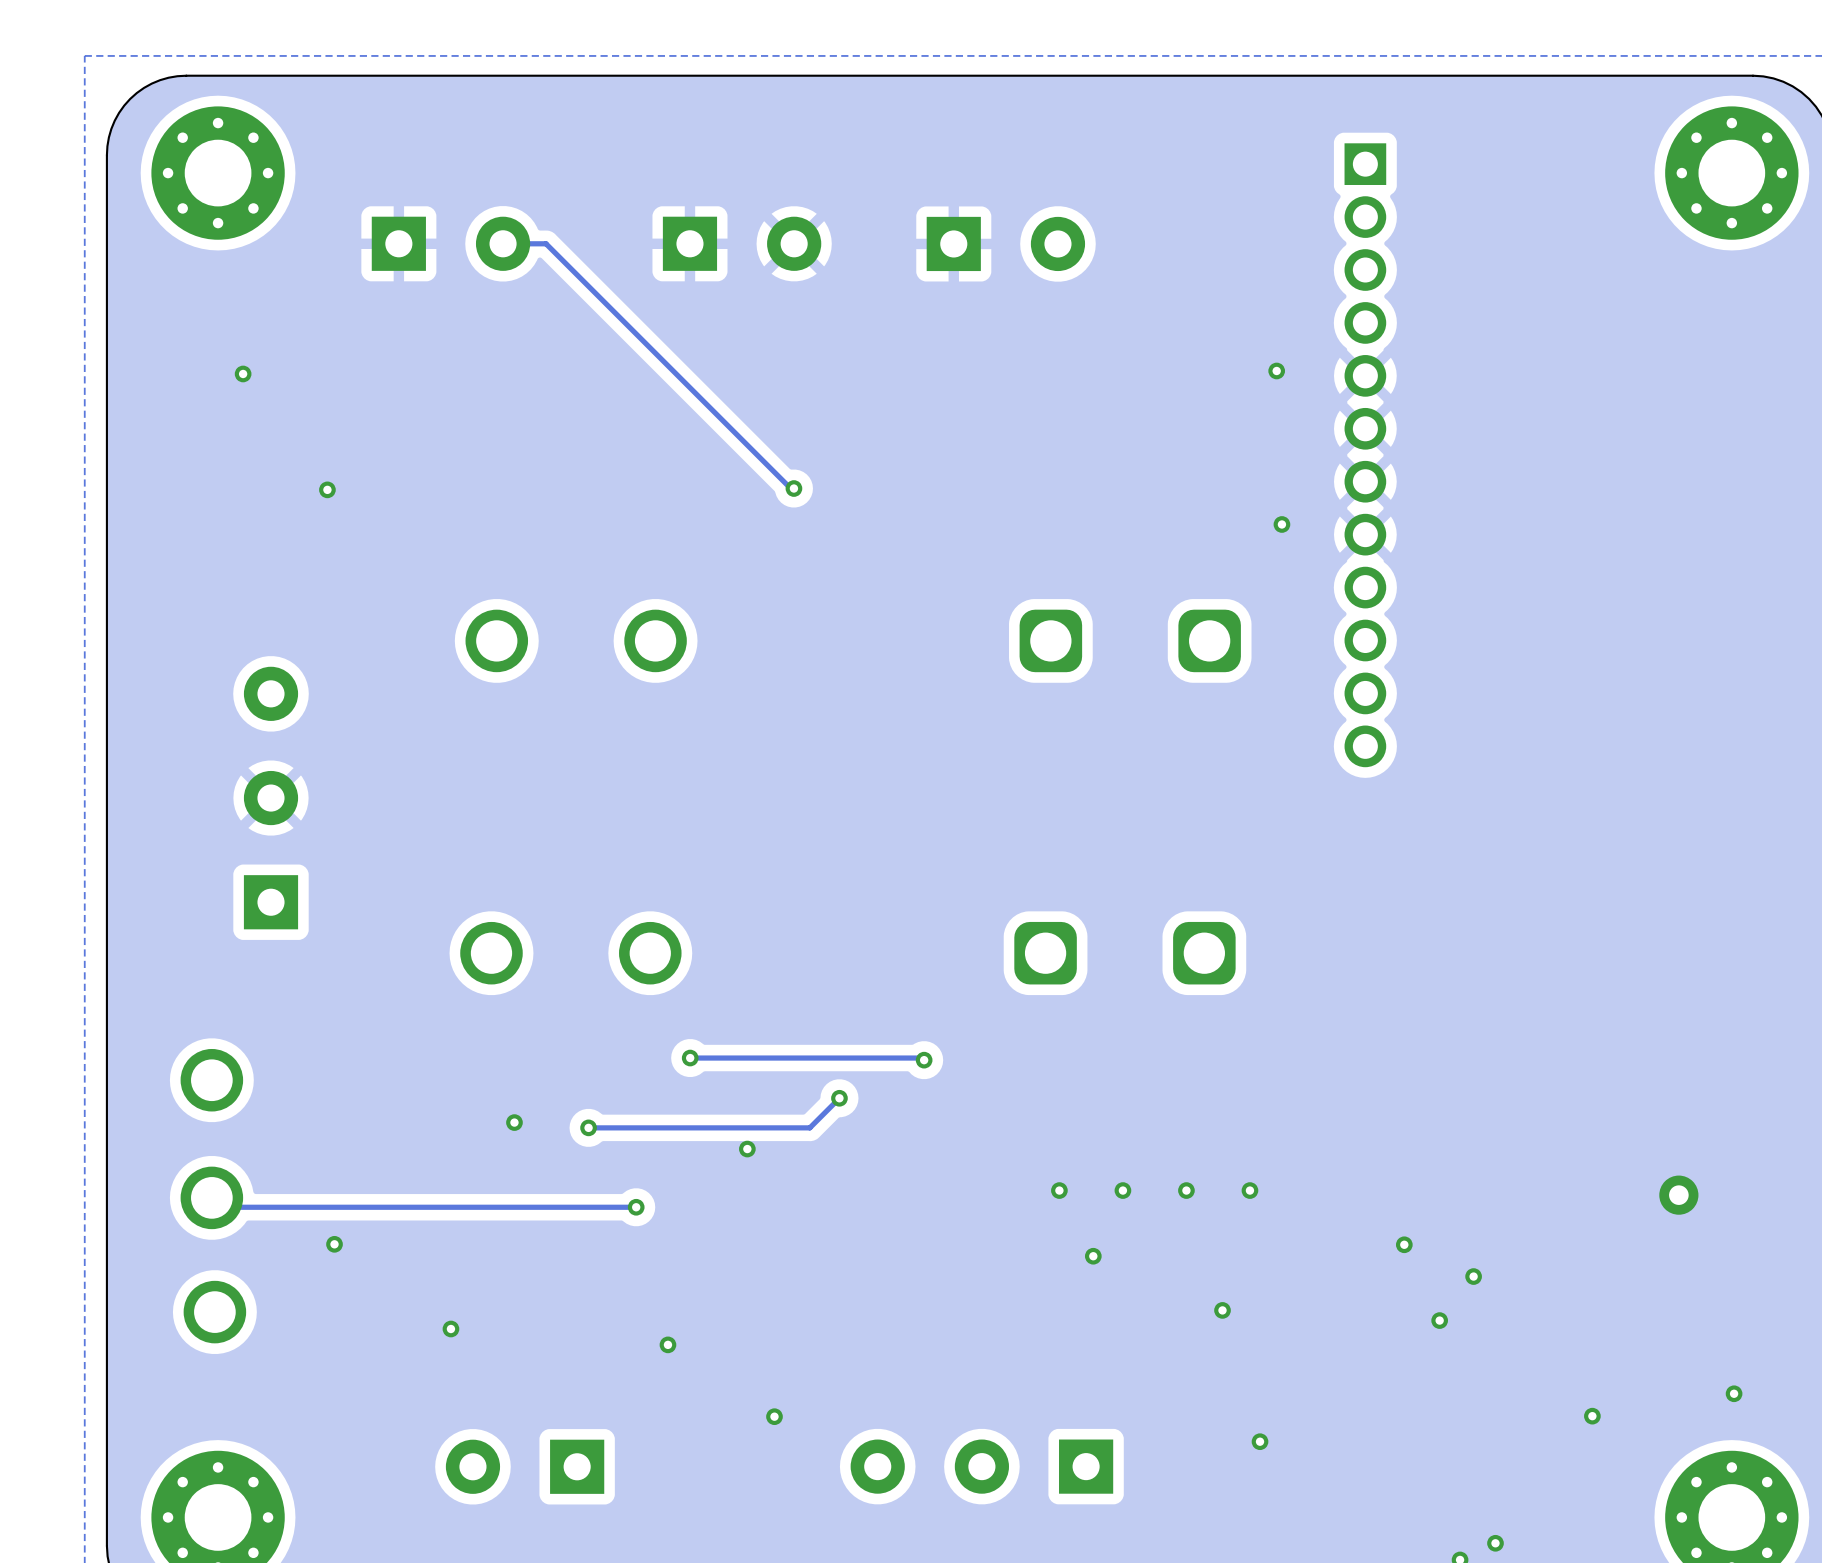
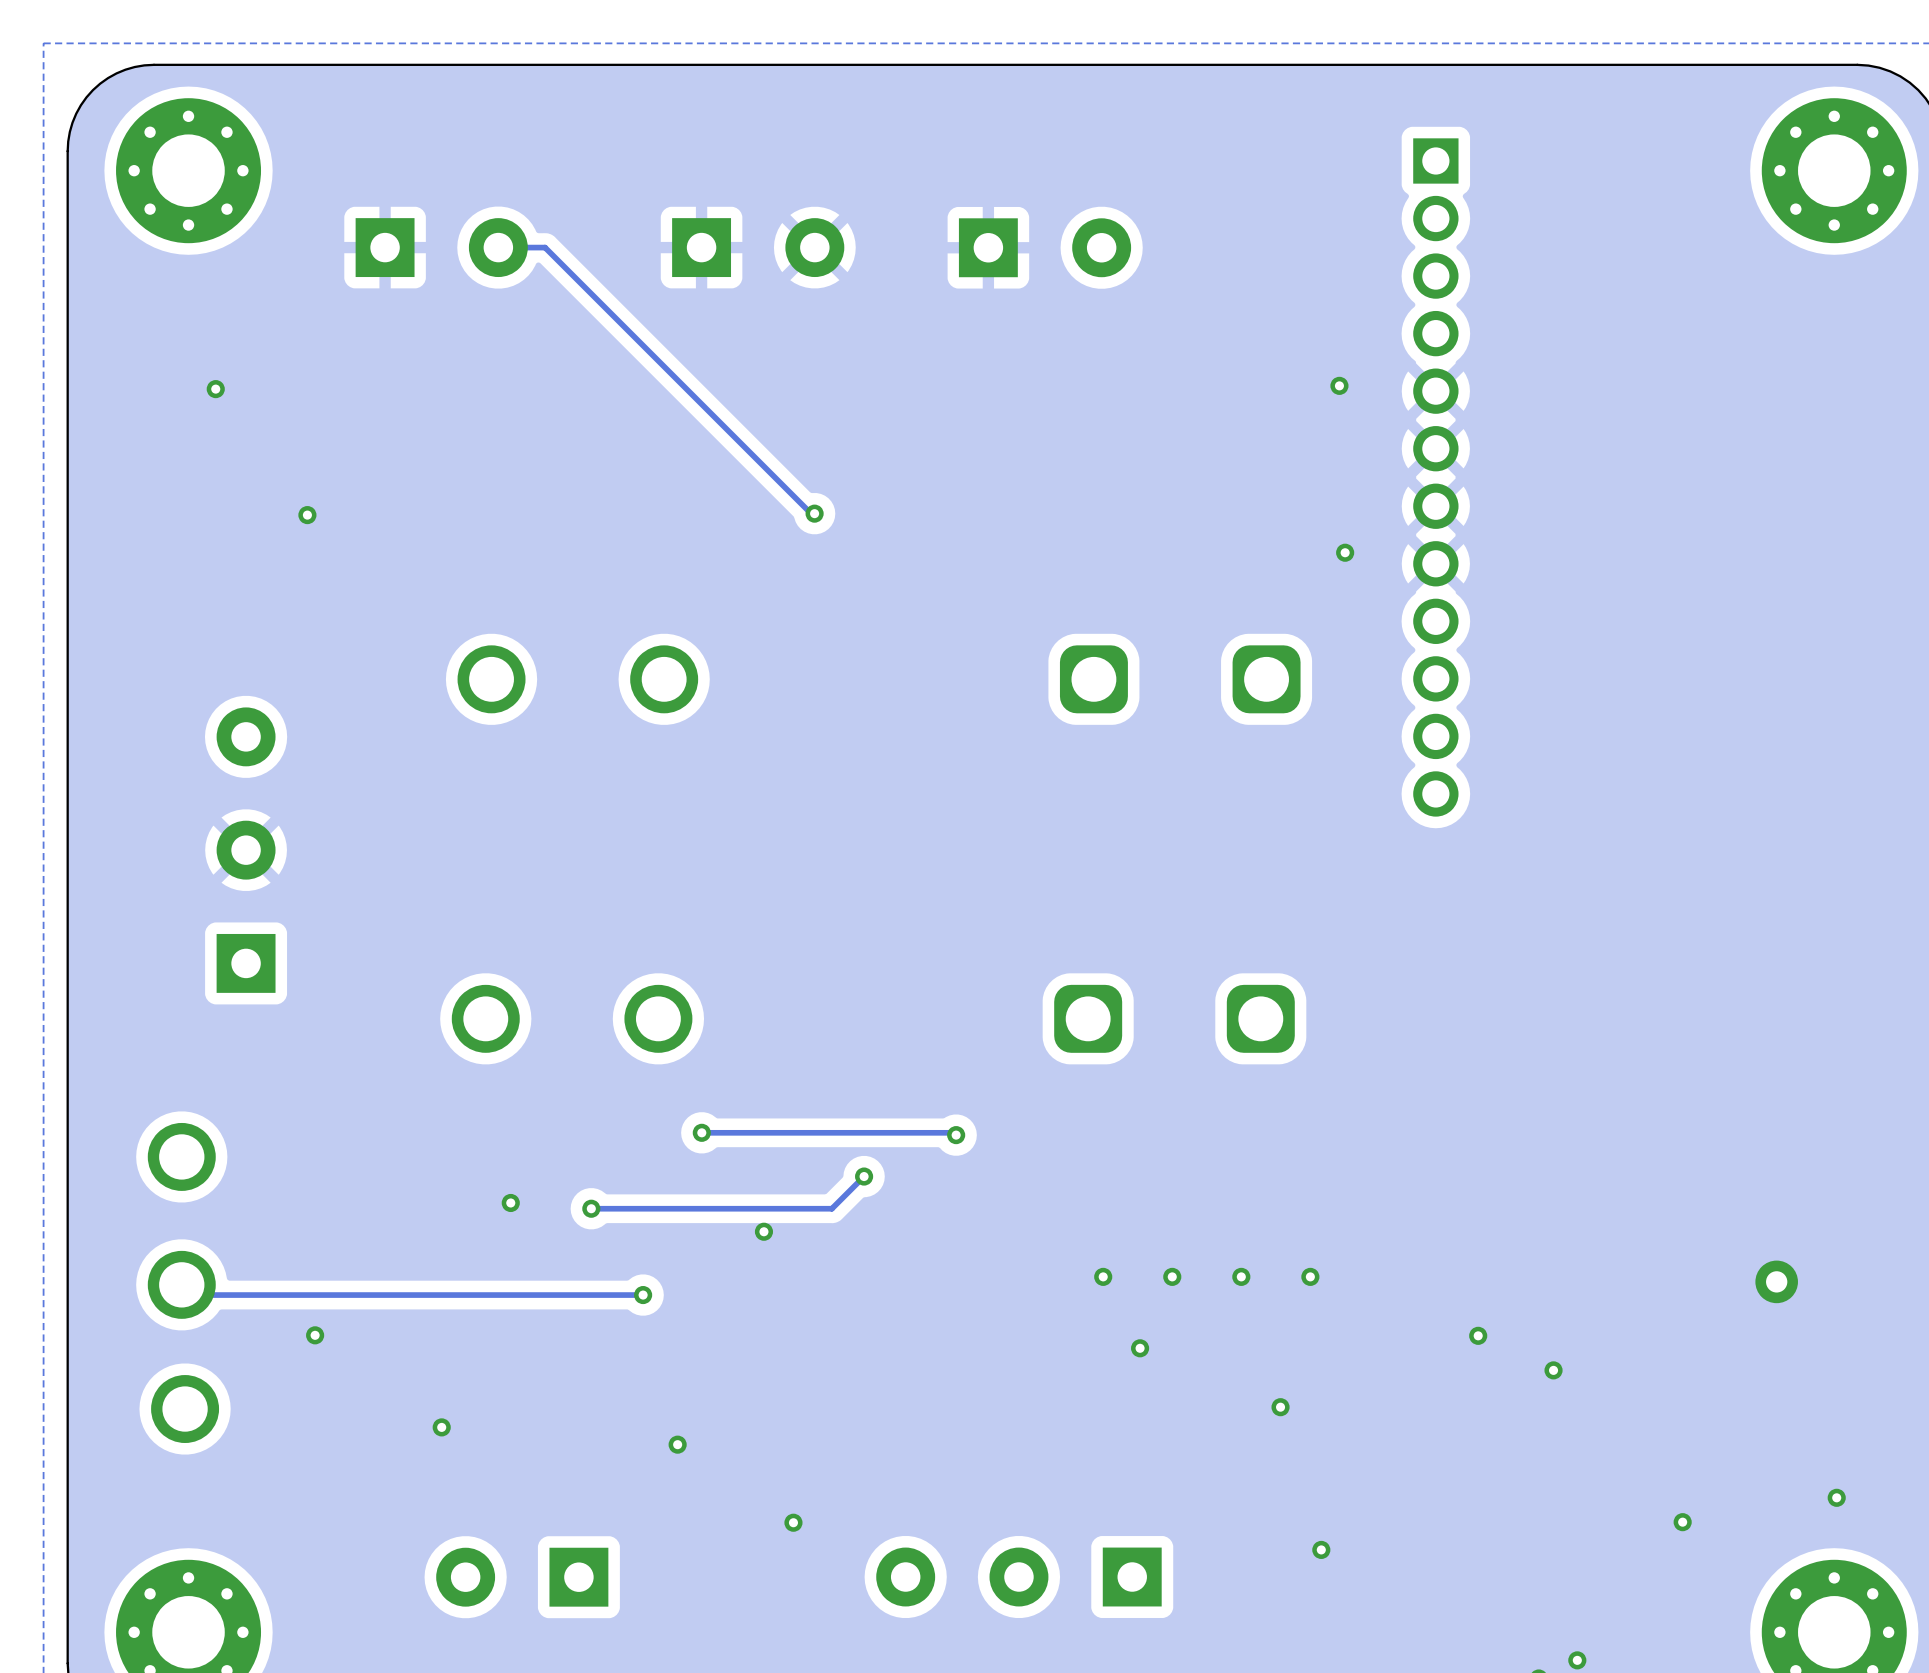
via: (1439, 1320) -> none

